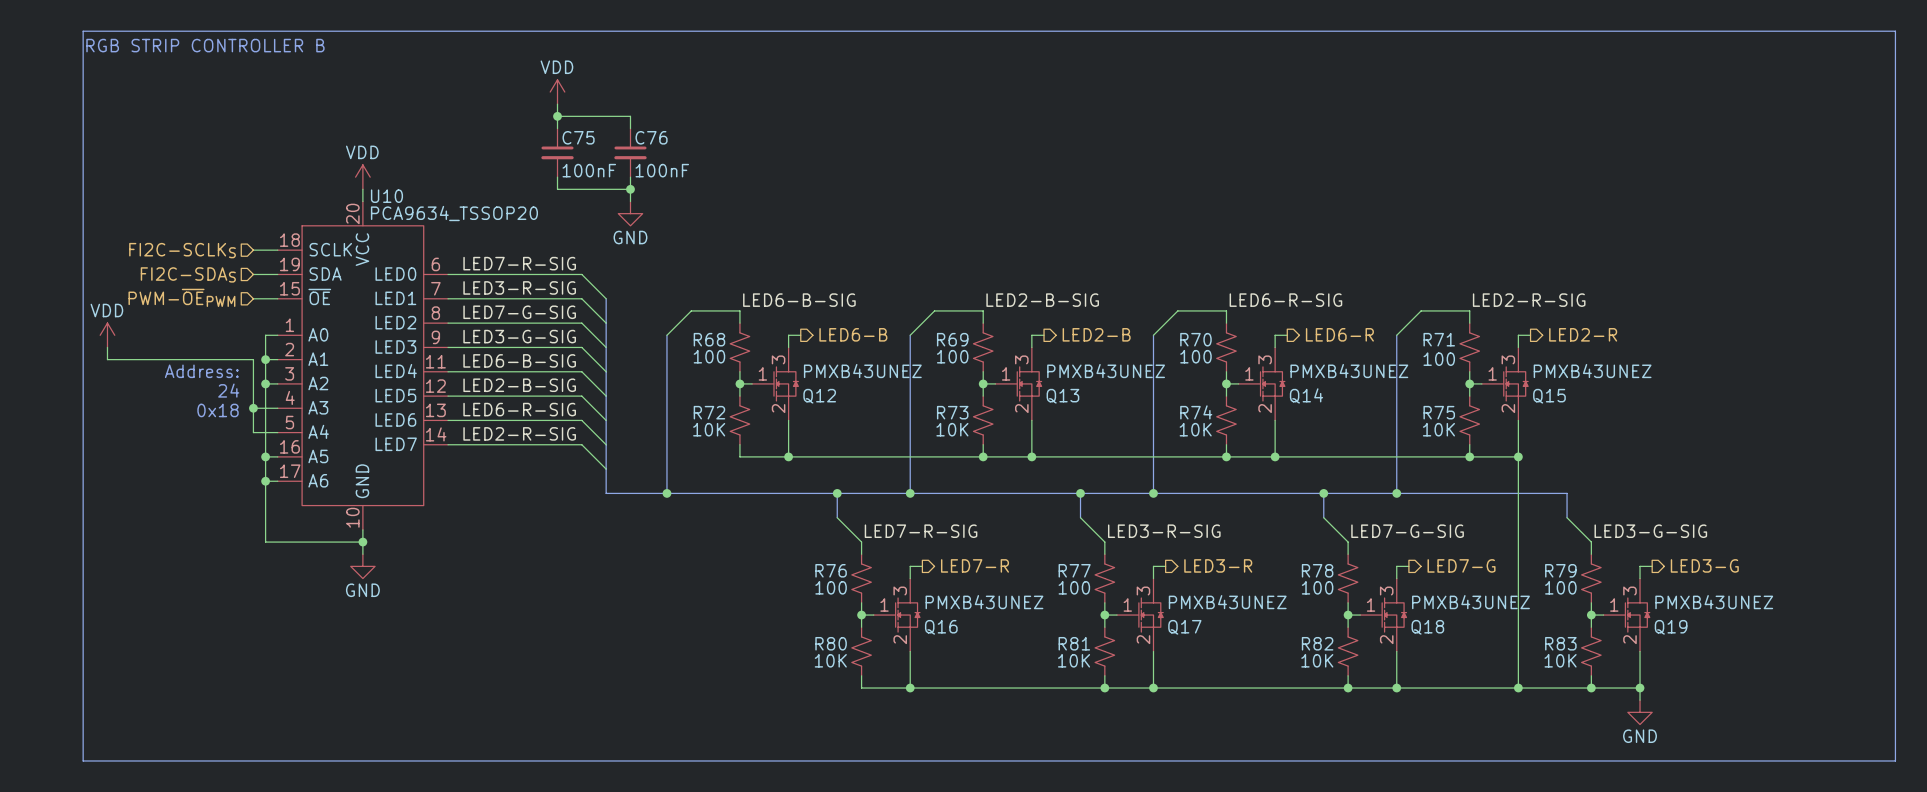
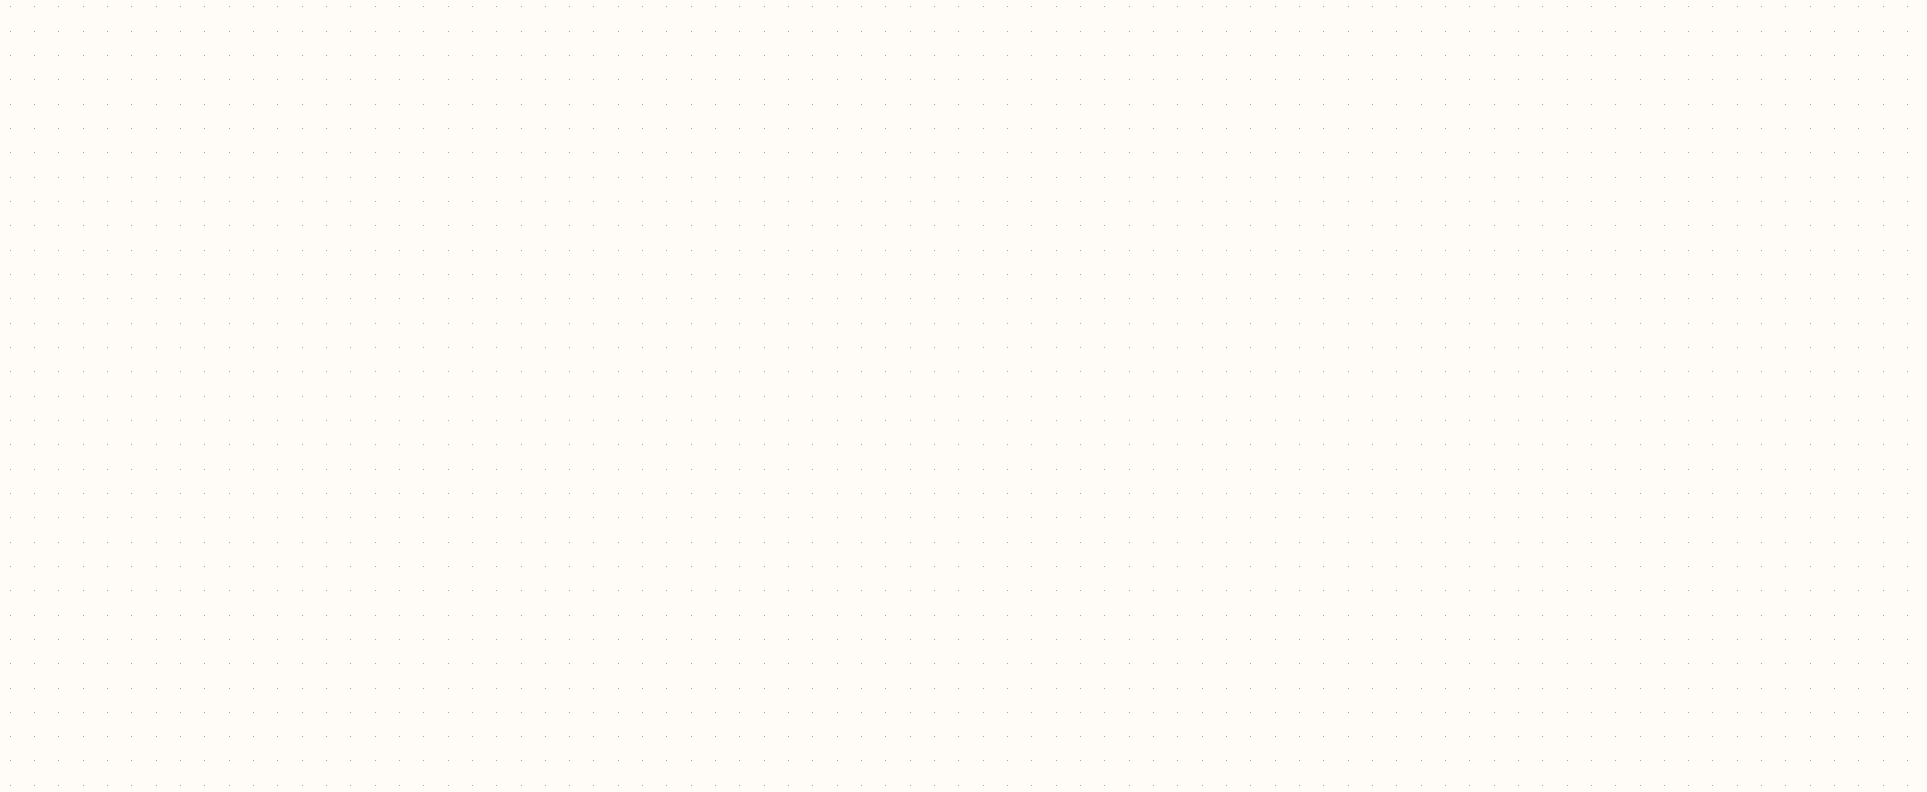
line: (83, 31) (83, 760) (1895, 760) (1895, 31) (83, 31) -> none
text: RGB STRIP CONTROLLER B (205, 45) -> none
power symbol: VDD (557, 92) -> none
wire: (557, 104) (557, 128) -> none
wire: (557, 116) (630, 116) (630, 128) -> none
junction: (557, 116) -> none
C75: 100nF (557, 152) -> none
C76: 100nF (630, 152) -> none
power symbol: VDD (362, 177) -> none
wire: (557, 177) (557, 189) (630, 189) -> none
wire: (630, 177) (630, 201) -> none
wire: (362, 189) (362, 201) -> none
junction: (630, 189) -> none
power symbol: GND (630, 213) -> none
hierarchical label: FI2C-SCLKS (182, 250) -> none
wire: (253, 250) (277, 250) -> none
label: LED7-R-SIG (519, 263) -> none
hierarchical label: FI2C-SDAS (188, 274) -> none
wire: (253, 274) (277, 274) -> none
wire: (448, 274) (581, 274) (606, 298) -> none
label: LED3-R-SIG (519, 287) -> none
hierarchical label: PWM-~{OE}PWM (181, 297) -> none
wire: (253, 298) (277, 298) -> none
wire: (448, 298) (581, 298) (606, 323) -> none
bus: (606, 298) (606, 493) (1567, 493) (1567, 517) -> none
label: LED6-B-SIG (799, 300) -> none
label: LED2-B-SIG (1042, 300) -> none
label: LED6-R-SIG (1285, 300) -> none
label: LED2-R-SIG (1529, 300) -> none
label: LED7-G-SIG (519, 312) -> none
wire: (448, 323) (581, 323) (606, 347) -> none
wire: (739, 323) (739, 310) (691, 310) (666, 335) -> none
wire: (983, 323) (983, 310) (934, 310) (910, 335) -> none
wire: (1226, 323) (1226, 310) (1177, 310) (1153, 335) -> none
wire: (1469, 323) (1469, 310) (1421, 310) (1396, 335) -> none
hierarchical label: LED6-B (853, 334) -> none
hierarchical label: LED2-B (1096, 334) -> none
hierarchical label: LED6-R (1339, 334) -> none
hierarchical label: LED2-R (1583, 334) -> none
power symbol: VDD (107, 335) -> none
wire: (277, 335) (265, 335) (265, 542) (362, 542) -> none
bus: (666, 335) (666, 493) -> none
wire: (800, 335) (788, 335) (788, 347) -> none
bus: (910, 335) (910, 493) -> none
wire: (1044, 335) (1031, 335) (1031, 347) -> none
bus: (1153, 335) (1153, 493) -> none
wire: (1287, 335) (1275, 335) (1275, 347) -> none
bus: (1396, 335) (1396, 493) -> none
wire: (1530, 335) (1518, 335) (1518, 347) -> none
label: LED3-G-SIG (519, 336) -> none
wire: (107, 347) (107, 359) (253, 359) (253, 432) (277, 432) -> none
wire: (448, 347) (581, 347) (606, 371) -> none
R68: 100 (739, 347) -> none
R69: 100 (983, 347) -> none
R70: 100 (1226, 347) -> none
R71: 100 (1469, 347) -> none
wire: (265, 359) (277, 359) -> none
junction: (265, 359) -> none
label: LED6-B-SIG (519, 360) -> none
U10: PCA9634_TSSOP20 (362, 365) -> none
text: Address: (201, 371) -> none
wire: (448, 371) (581, 371) (606, 396) -> none
wire: (739, 371) (739, 396) -> none
wire: (983, 371) (983, 396) -> none
wire: (1226, 371) (1226, 396) -> none
wire: (1469, 371) (1469, 396) -> none
wire: (265, 383) (277, 383) -> none
junction: (265, 383) -> none
wire: (739, 383) (752, 383) -> none
junction: (739, 383) -> none
Q12: PMXB43UNEZ (775, 383) -> none
wire: (983, 383) (995, 383) -> none
junction: (983, 383) -> none
Q13: PMXB43UNEZ (1018, 383) -> none
wire: (1226, 383) (1238, 383) -> none
junction: (1226, 383) -> none
Q14: PMXB43UNEZ (1261, 383) -> none
wire: (1469, 383) (1481, 383) -> none
junction: (1469, 383) -> none
Q15: PMXB43UNEZ (1505, 383) -> none
label: LED2-B-SIG (519, 385) -> none
text: 24 (228, 390) -> none
wire: (448, 396) (581, 396) (606, 420) -> none
wire: (253, 408) (277, 408) -> none
junction: (253, 408) -> none
label: LED6-R-SIG (519, 409) -> none
text: 0x18 (218, 410) -> none
wire: (448, 420) (581, 420) (606, 444) -> none
R72: 10K (739, 420) -> none
wire: (788, 420) (788, 456) -> none
R73: 10K (983, 420) -> none
wire: (1031, 420) (1031, 456) -> none
R74: 10K (1226, 420) -> none
wire: (1275, 420) (1275, 456) -> none
R75: 10K (1469, 420) -> none
wire: (1518, 420) (1518, 688) -> none
label: LED2-R-SIG (519, 433) -> none
wire: (448, 444) (581, 444) (606, 469) -> none
wire: (739, 444) (739, 456) (1518, 456) -> none
wire: (983, 444) (983, 456) -> none
wire: (1226, 444) (1226, 456) -> none
wire: (1469, 444) (1469, 456) -> none
wire: (265, 456) (277, 456) -> none
junction: (265, 456) -> none
junction: (788, 456) -> none
junction: (983, 456) -> none
junction: (1031, 456) -> none
junction: (1226, 456) -> none
junction: (1275, 456) -> none
junction: (1469, 456) -> none
junction: (1518, 456) -> none
wire: (265, 481) (277, 481) -> none
junction: (265, 481) -> none
junction: (666, 493) -> none
bus: (837, 493) (837, 517) -> none
junction: (837, 493) -> none
junction: (910, 493) -> none
bus: (1080, 493) (1080, 517) -> none
junction: (1080, 493) -> none
junction: (1153, 493) -> none
bus: (1323, 493) (1323, 517) -> none
junction: (1323, 493) -> none
junction: (1396, 493) -> none
wire: (837, 517) (861, 542) (861, 554) -> none
wire: (1080, 517) (1104, 542) (1104, 554) -> none
wire: (1323, 517) (1348, 542) (1348, 554) -> none
wire: (1567, 517) (1591, 542) (1591, 554) -> none
wire: (362, 529) (362, 554) -> none
label: LED7-R-SIG (921, 531) -> none
label: LED3-R-SIG (1164, 531) -> none
label: LED7-G-SIG (1407, 531) -> none
label: LED3-G-SIG (1650, 531) -> none
junction: (362, 542) -> none
hierarchical label: LED7-R (975, 565) -> none
hierarchical label: LED3-R (1218, 565) -> none
hierarchical label: LED7-G (1461, 565) -> none
hierarchical label: LED3-G (1704, 565) -> none
power symbol: GND (362, 566) -> none
wire: (922, 566) (910, 566) (910, 578) -> none
wire: (1165, 566) (1153, 566) (1153, 578) -> none
wire: (1408, 566) (1396, 566) (1396, 578) -> none
wire: (1652, 566) (1640, 566) (1640, 578) -> none
R76: 100 (861, 578) -> none
R77: 100 (1104, 578) -> none
R78: 100 (1348, 578) -> none
R79: 100 (1591, 578) -> none
wire: (861, 602) (861, 627) -> none
wire: (1104, 602) (1104, 627) -> none
wire: (1348, 602) (1348, 627) -> none
wire: (1591, 602) (1591, 627) -> none
wire: (861, 615) (873, 615) -> none
junction: (861, 615) -> none
Q16: PMXB43UNEZ (896, 615) -> none
wire: (1104, 615) (1117, 615) -> none
junction: (1104, 615) -> none
Q17: PMXB43UNEZ (1140, 615) -> none
wire: (1348, 615) (1360, 615) -> none
junction: (1348, 615) -> none
Q18: PMXB43UNEZ (1383, 615) -> none
wire: (1591, 615) (1603, 615) -> none
junction: (1591, 615) -> none
Q19: PMXB43UNEZ (1626, 615) -> none
R80: 10K (861, 651) -> none
wire: (910, 651) (910, 688) -> none
R81: 10K (1104, 651) -> none
wire: (1153, 651) (1153, 688) -> none
R82: 10K (1348, 651) -> none
wire: (1396, 651) (1396, 688) -> none
R83: 10K (1591, 651) -> none
wire: (1640, 651) (1640, 700) -> none
wire: (861, 675) (861, 688) (1640, 688) -> none
wire: (1104, 675) (1104, 688) -> none
wire: (1348, 675) (1348, 688) -> none
wire: (1591, 675) (1591, 688) -> none
junction: (910, 688) -> none
junction: (1104, 688) -> none
junction: (1153, 688) -> none
junction: (1348, 688) -> none
junction: (1396, 688) -> none
junction: (1518, 688) -> none
junction: (1591, 688) -> none
junction: (1640, 688) -> none
power symbol: GND (1640, 712) -> none

